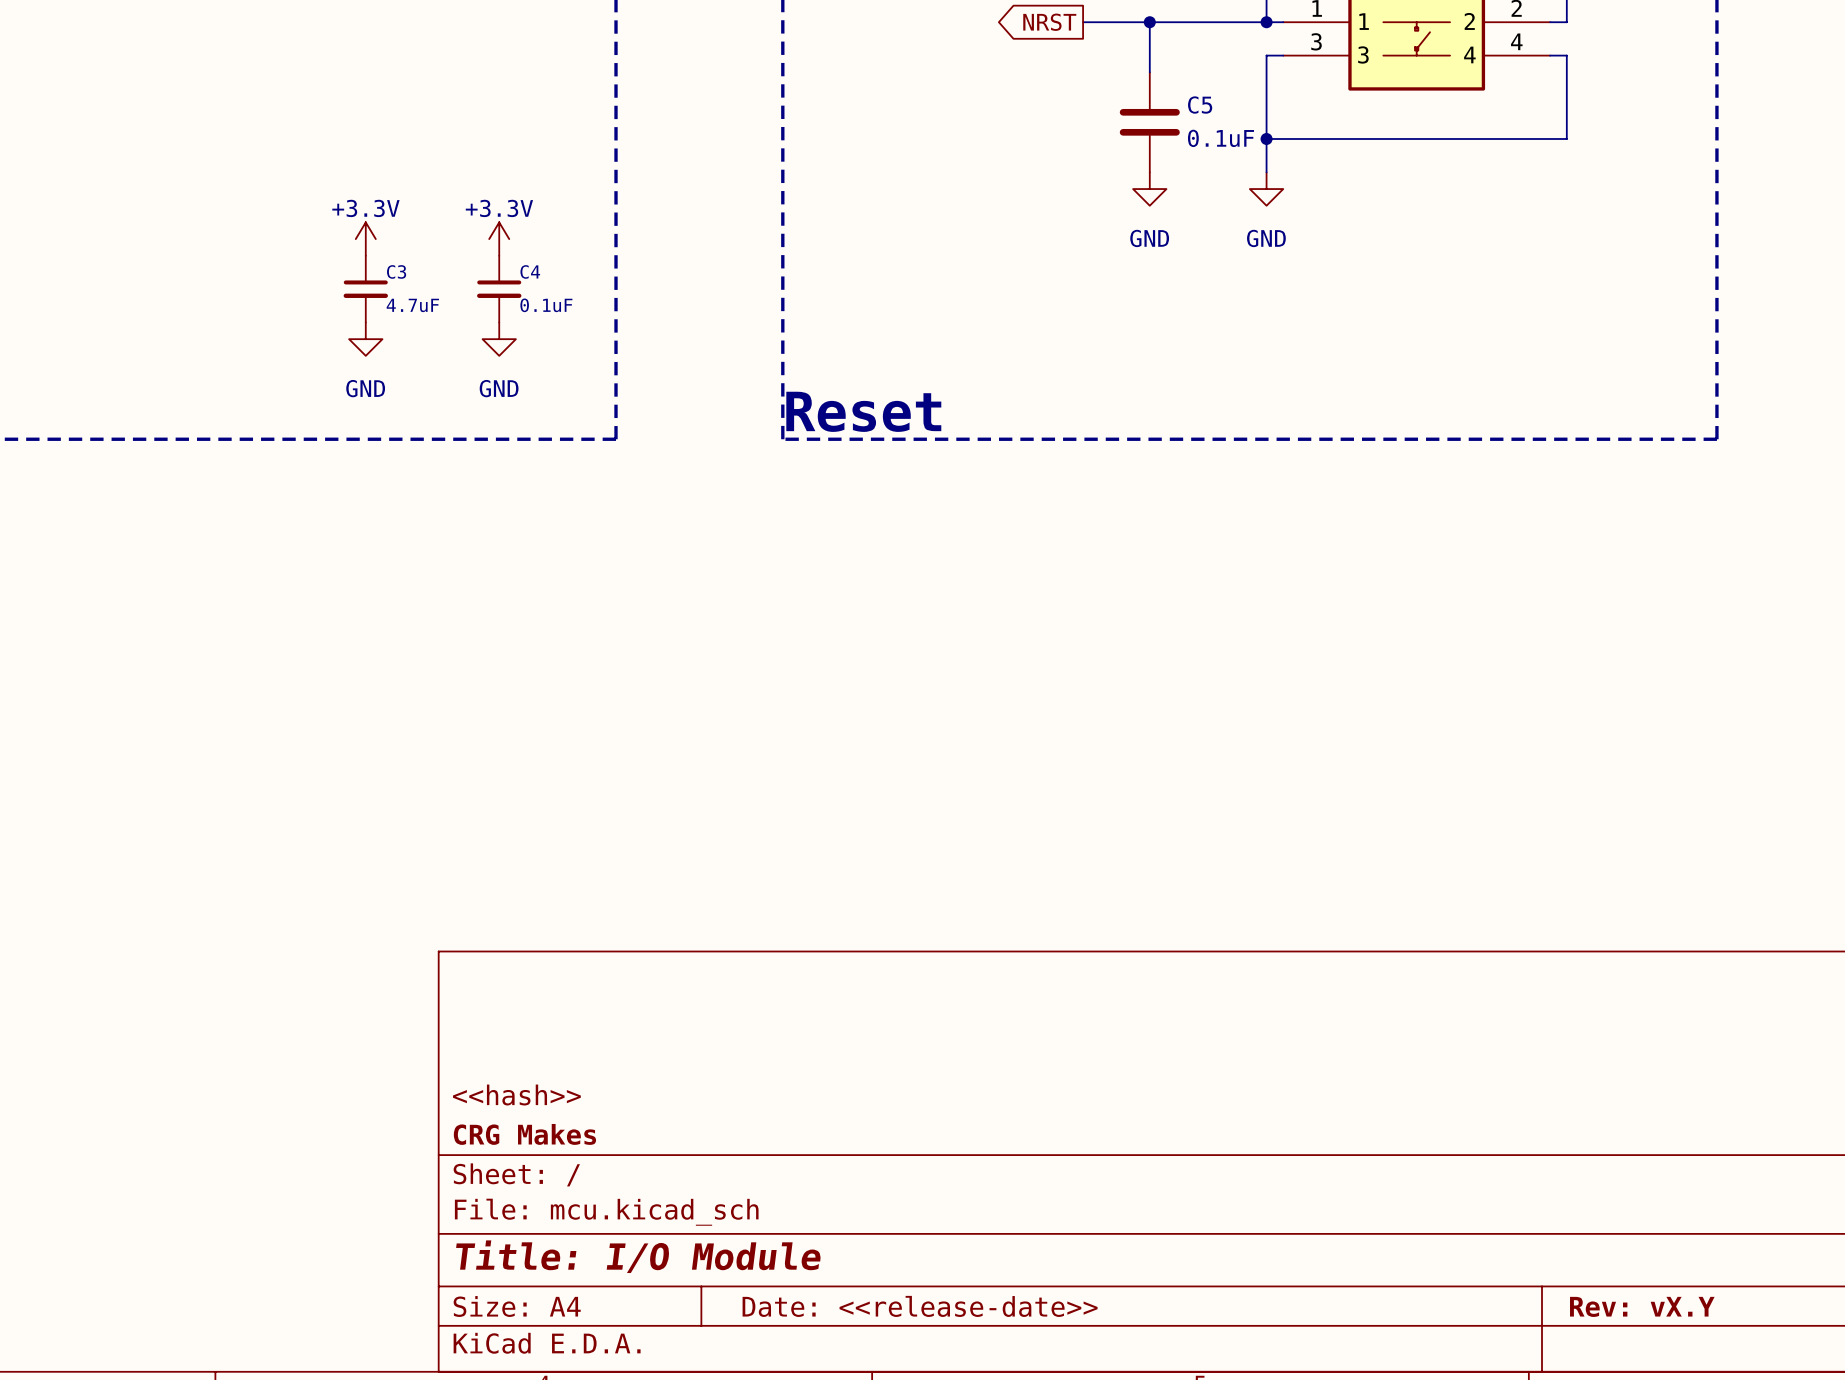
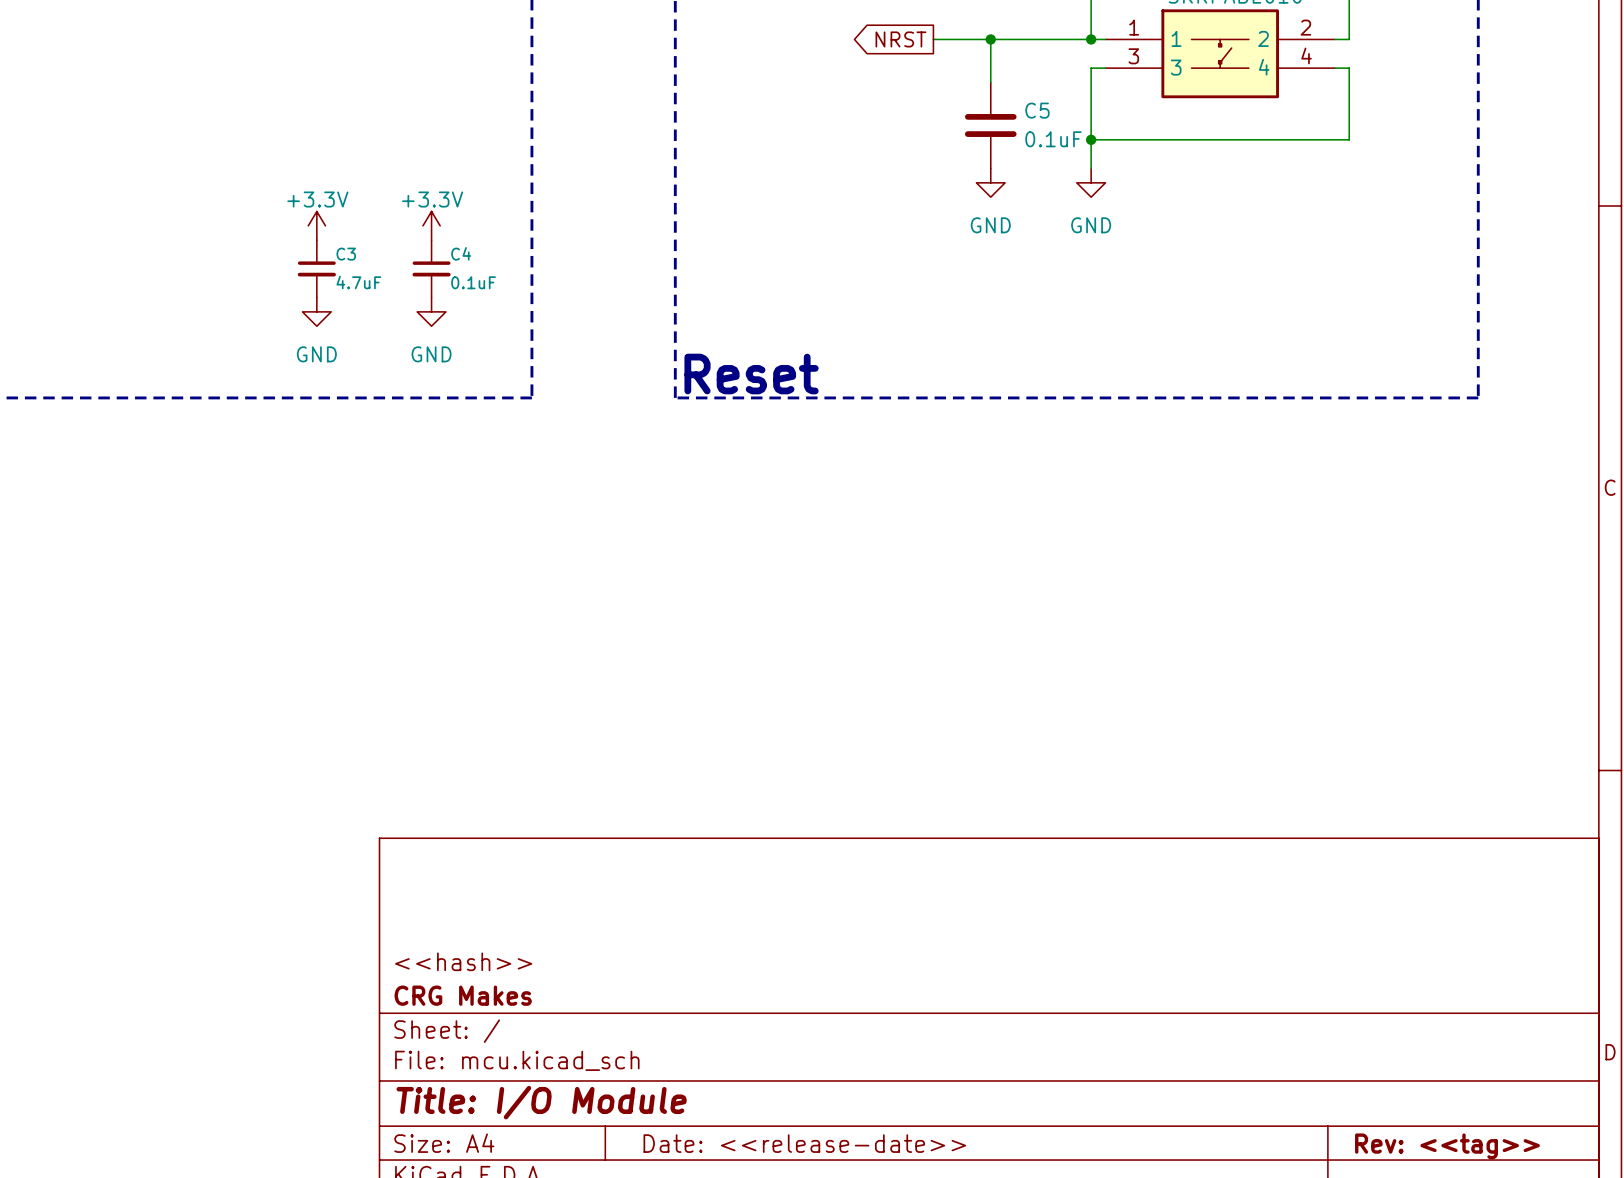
title block: Rev: vX.Y (1642, 1306) -> Rev: <<tag>> (1447, 1146)

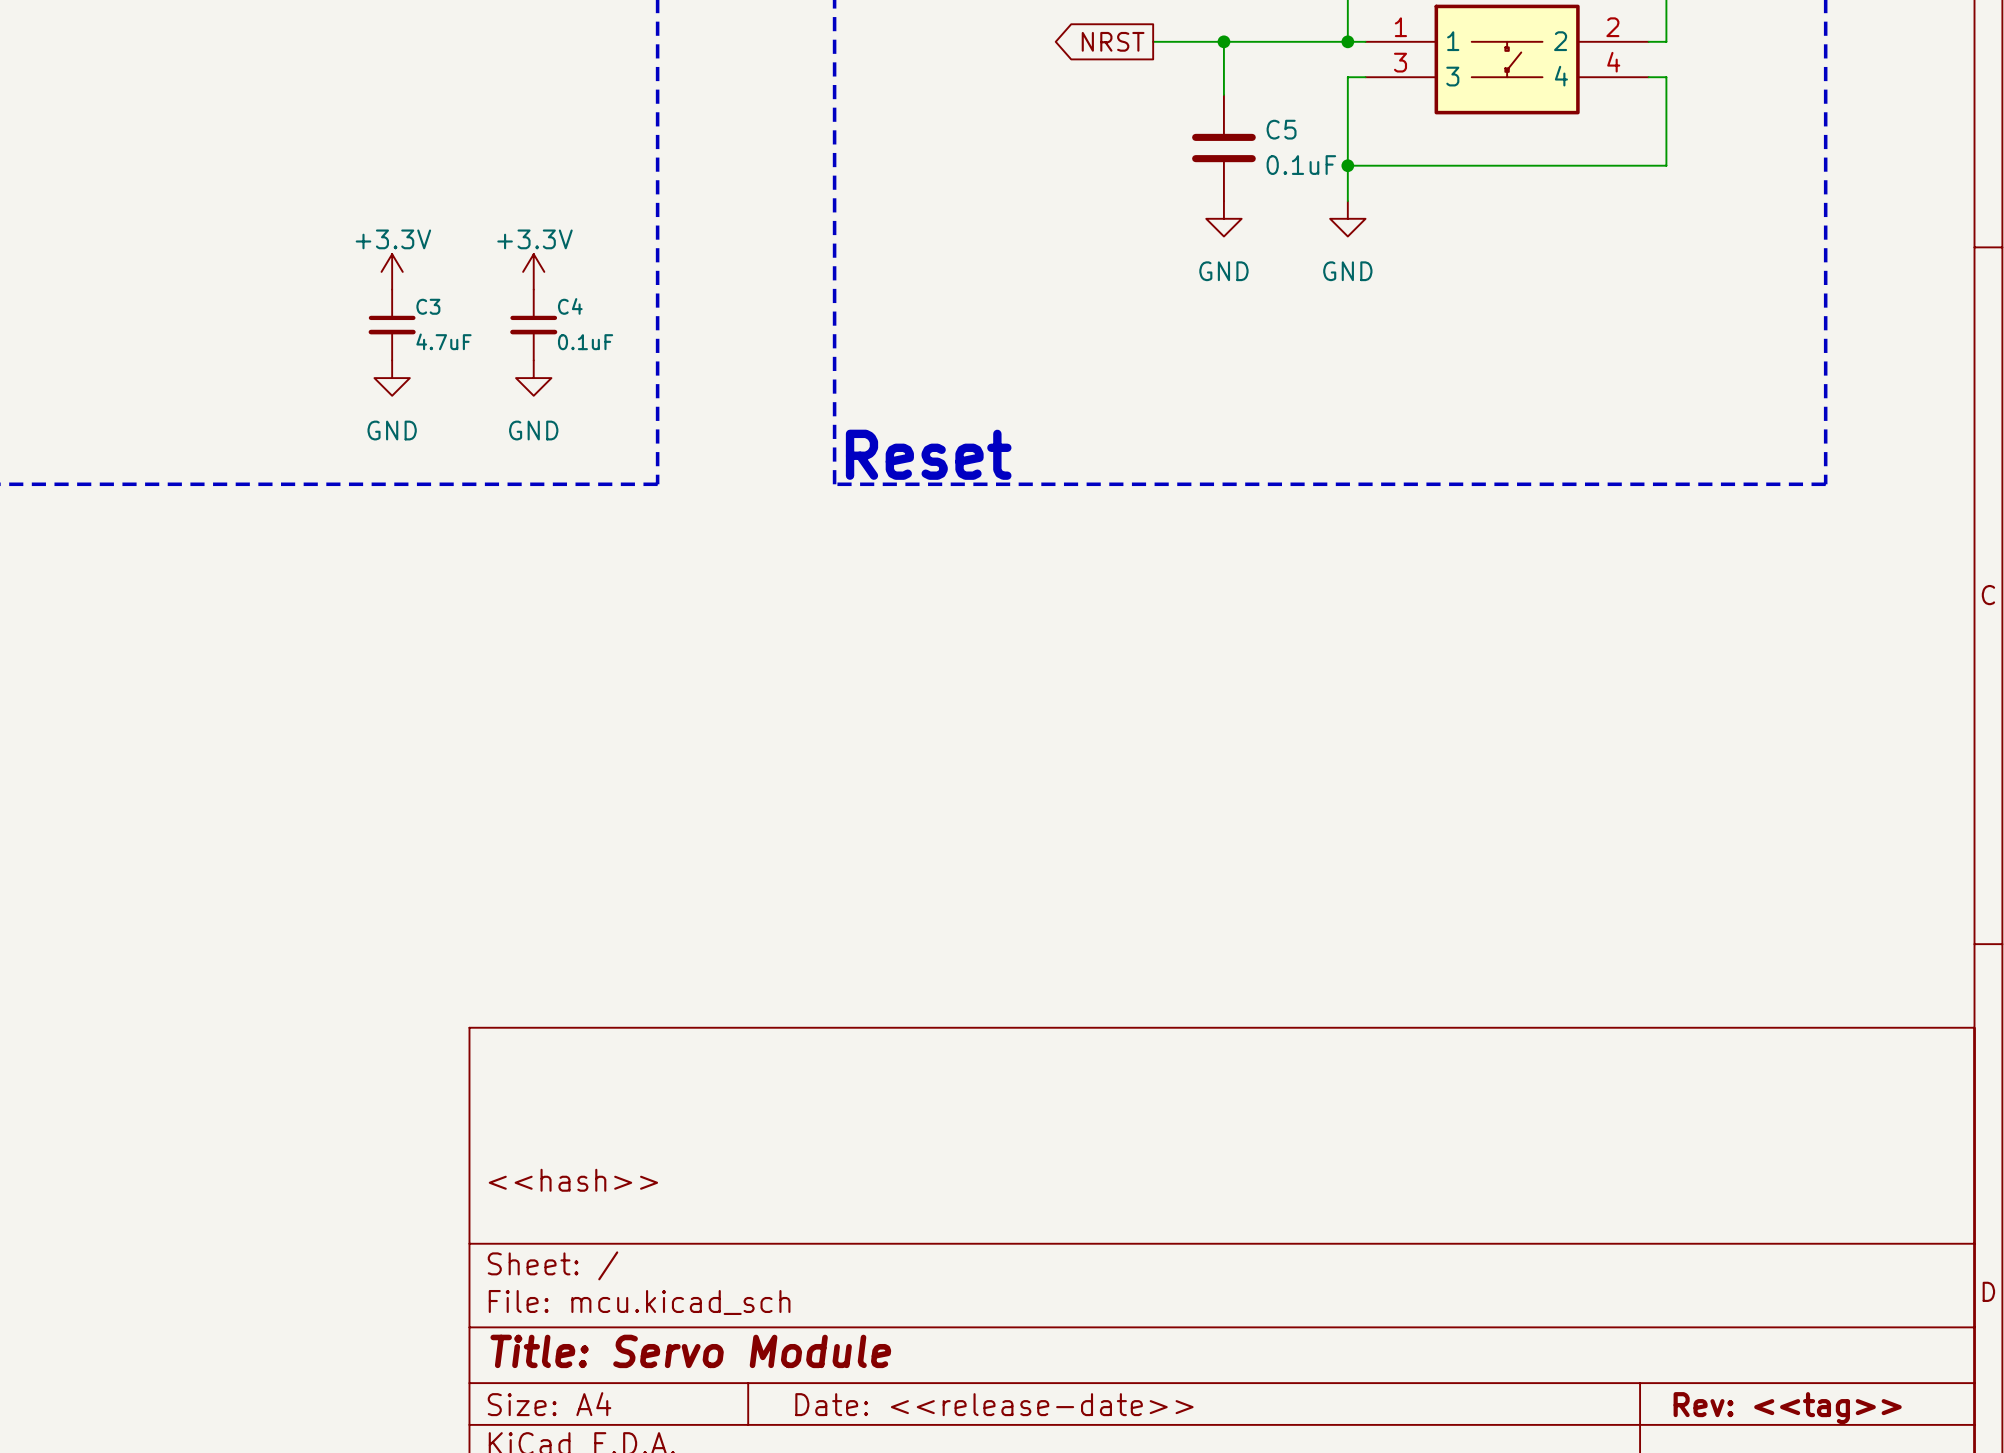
title block: CRG Makes (463, 995) -> none
title block: Title: I/O Module (541, 1102) -> Title: Servo Module (690, 1351)

